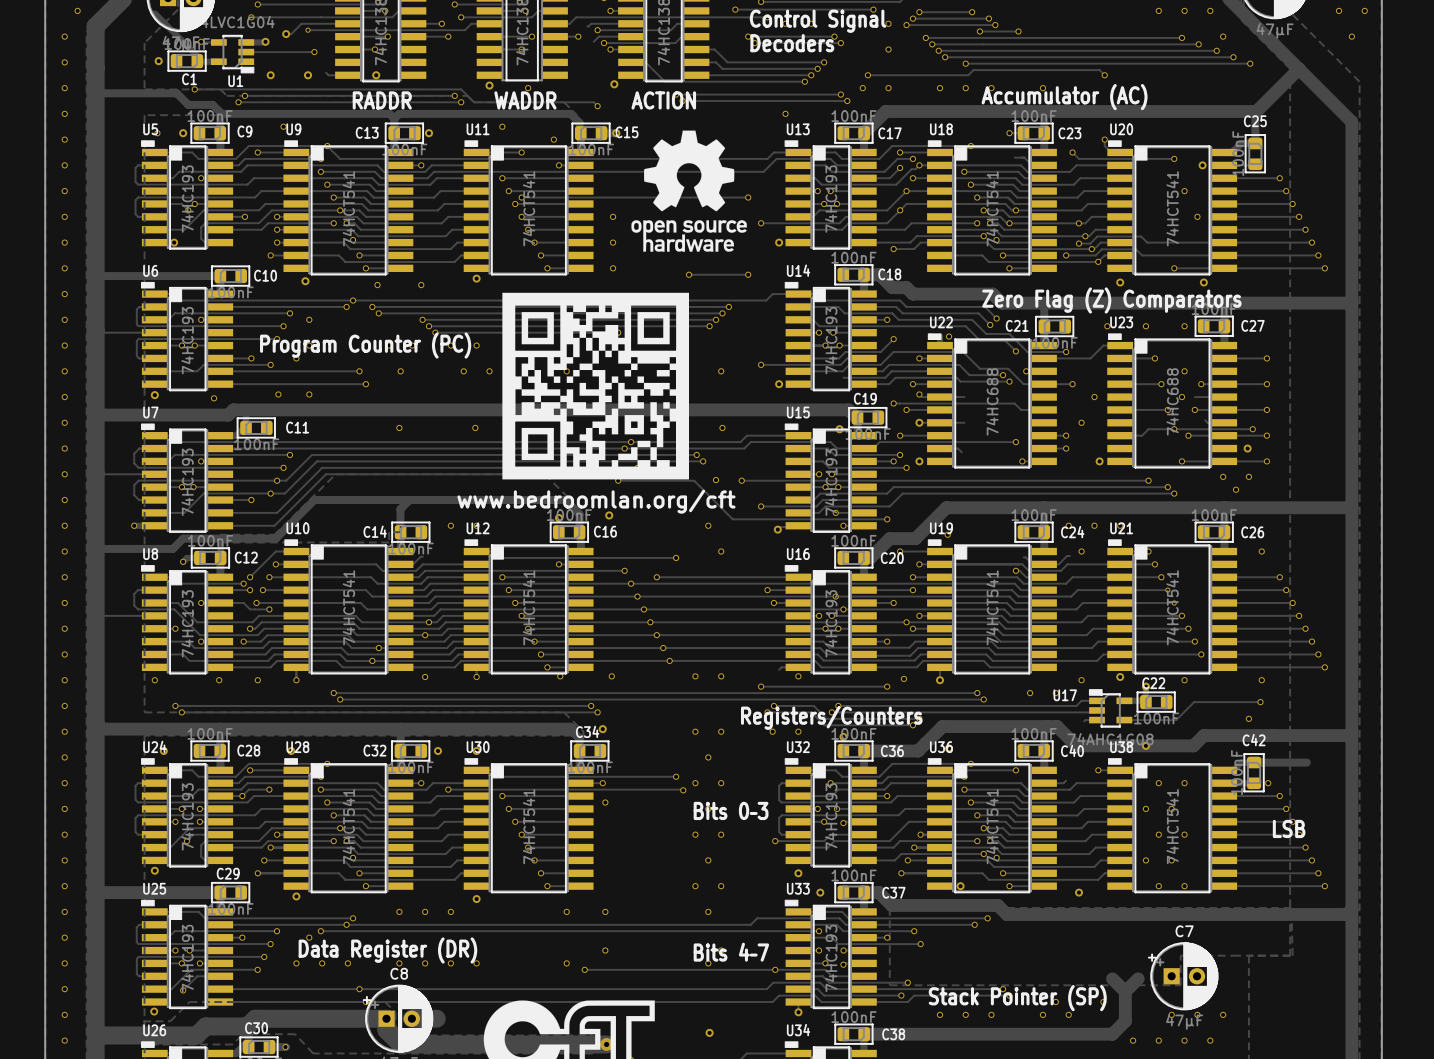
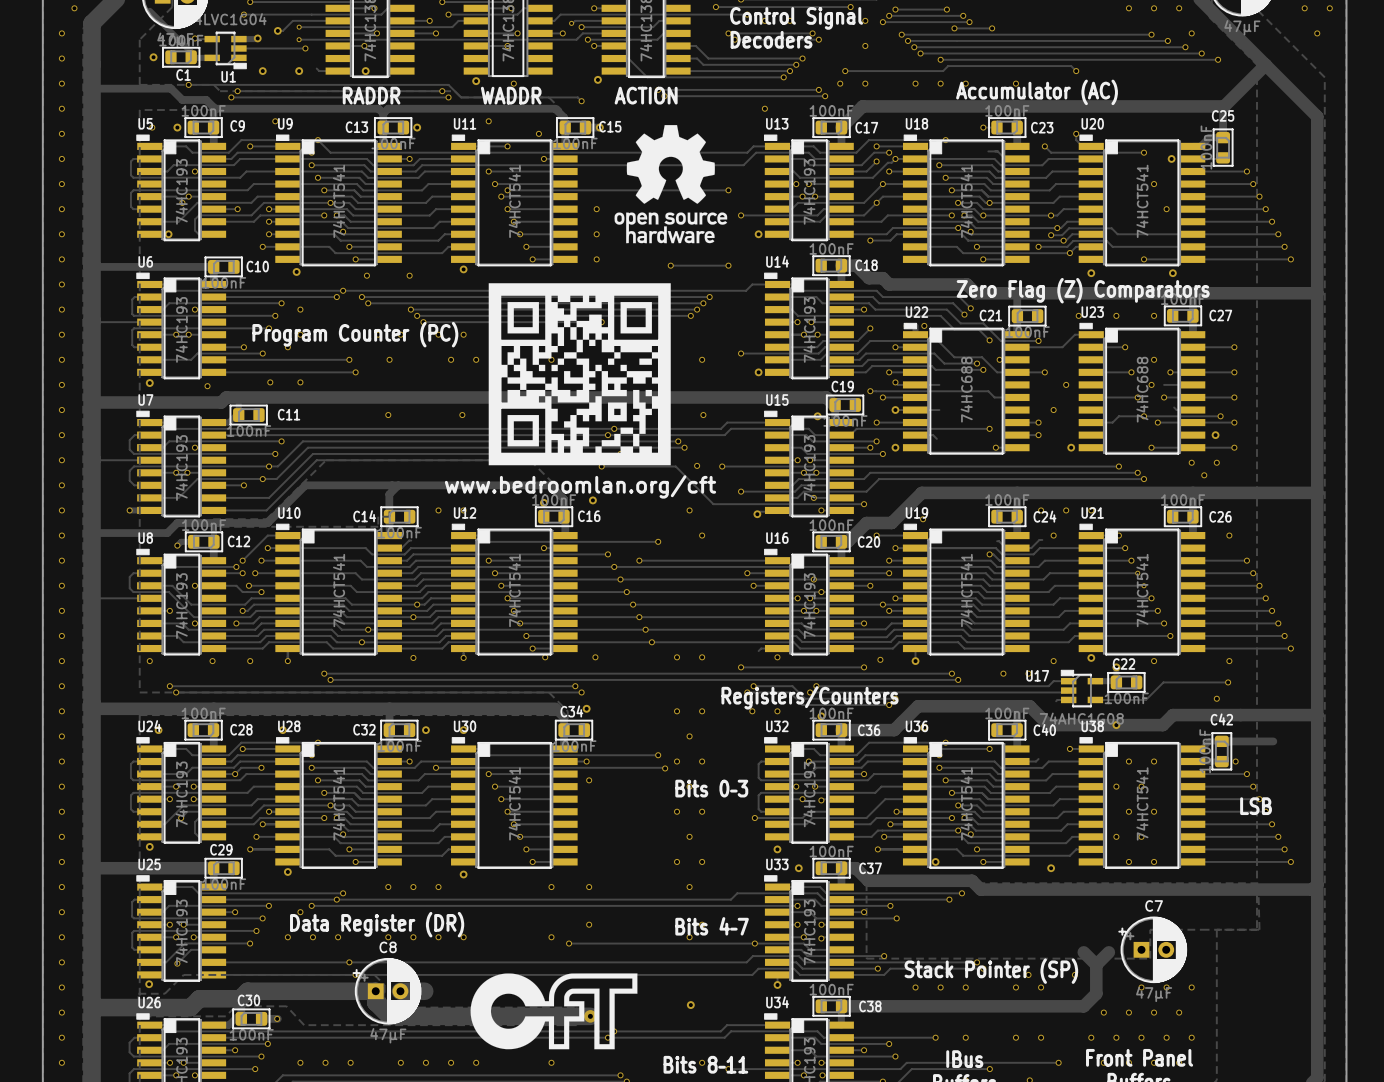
via: none -> (571, 23)
track: none -> (577, 38) (299, 39)
via: none -> (299, 39)

